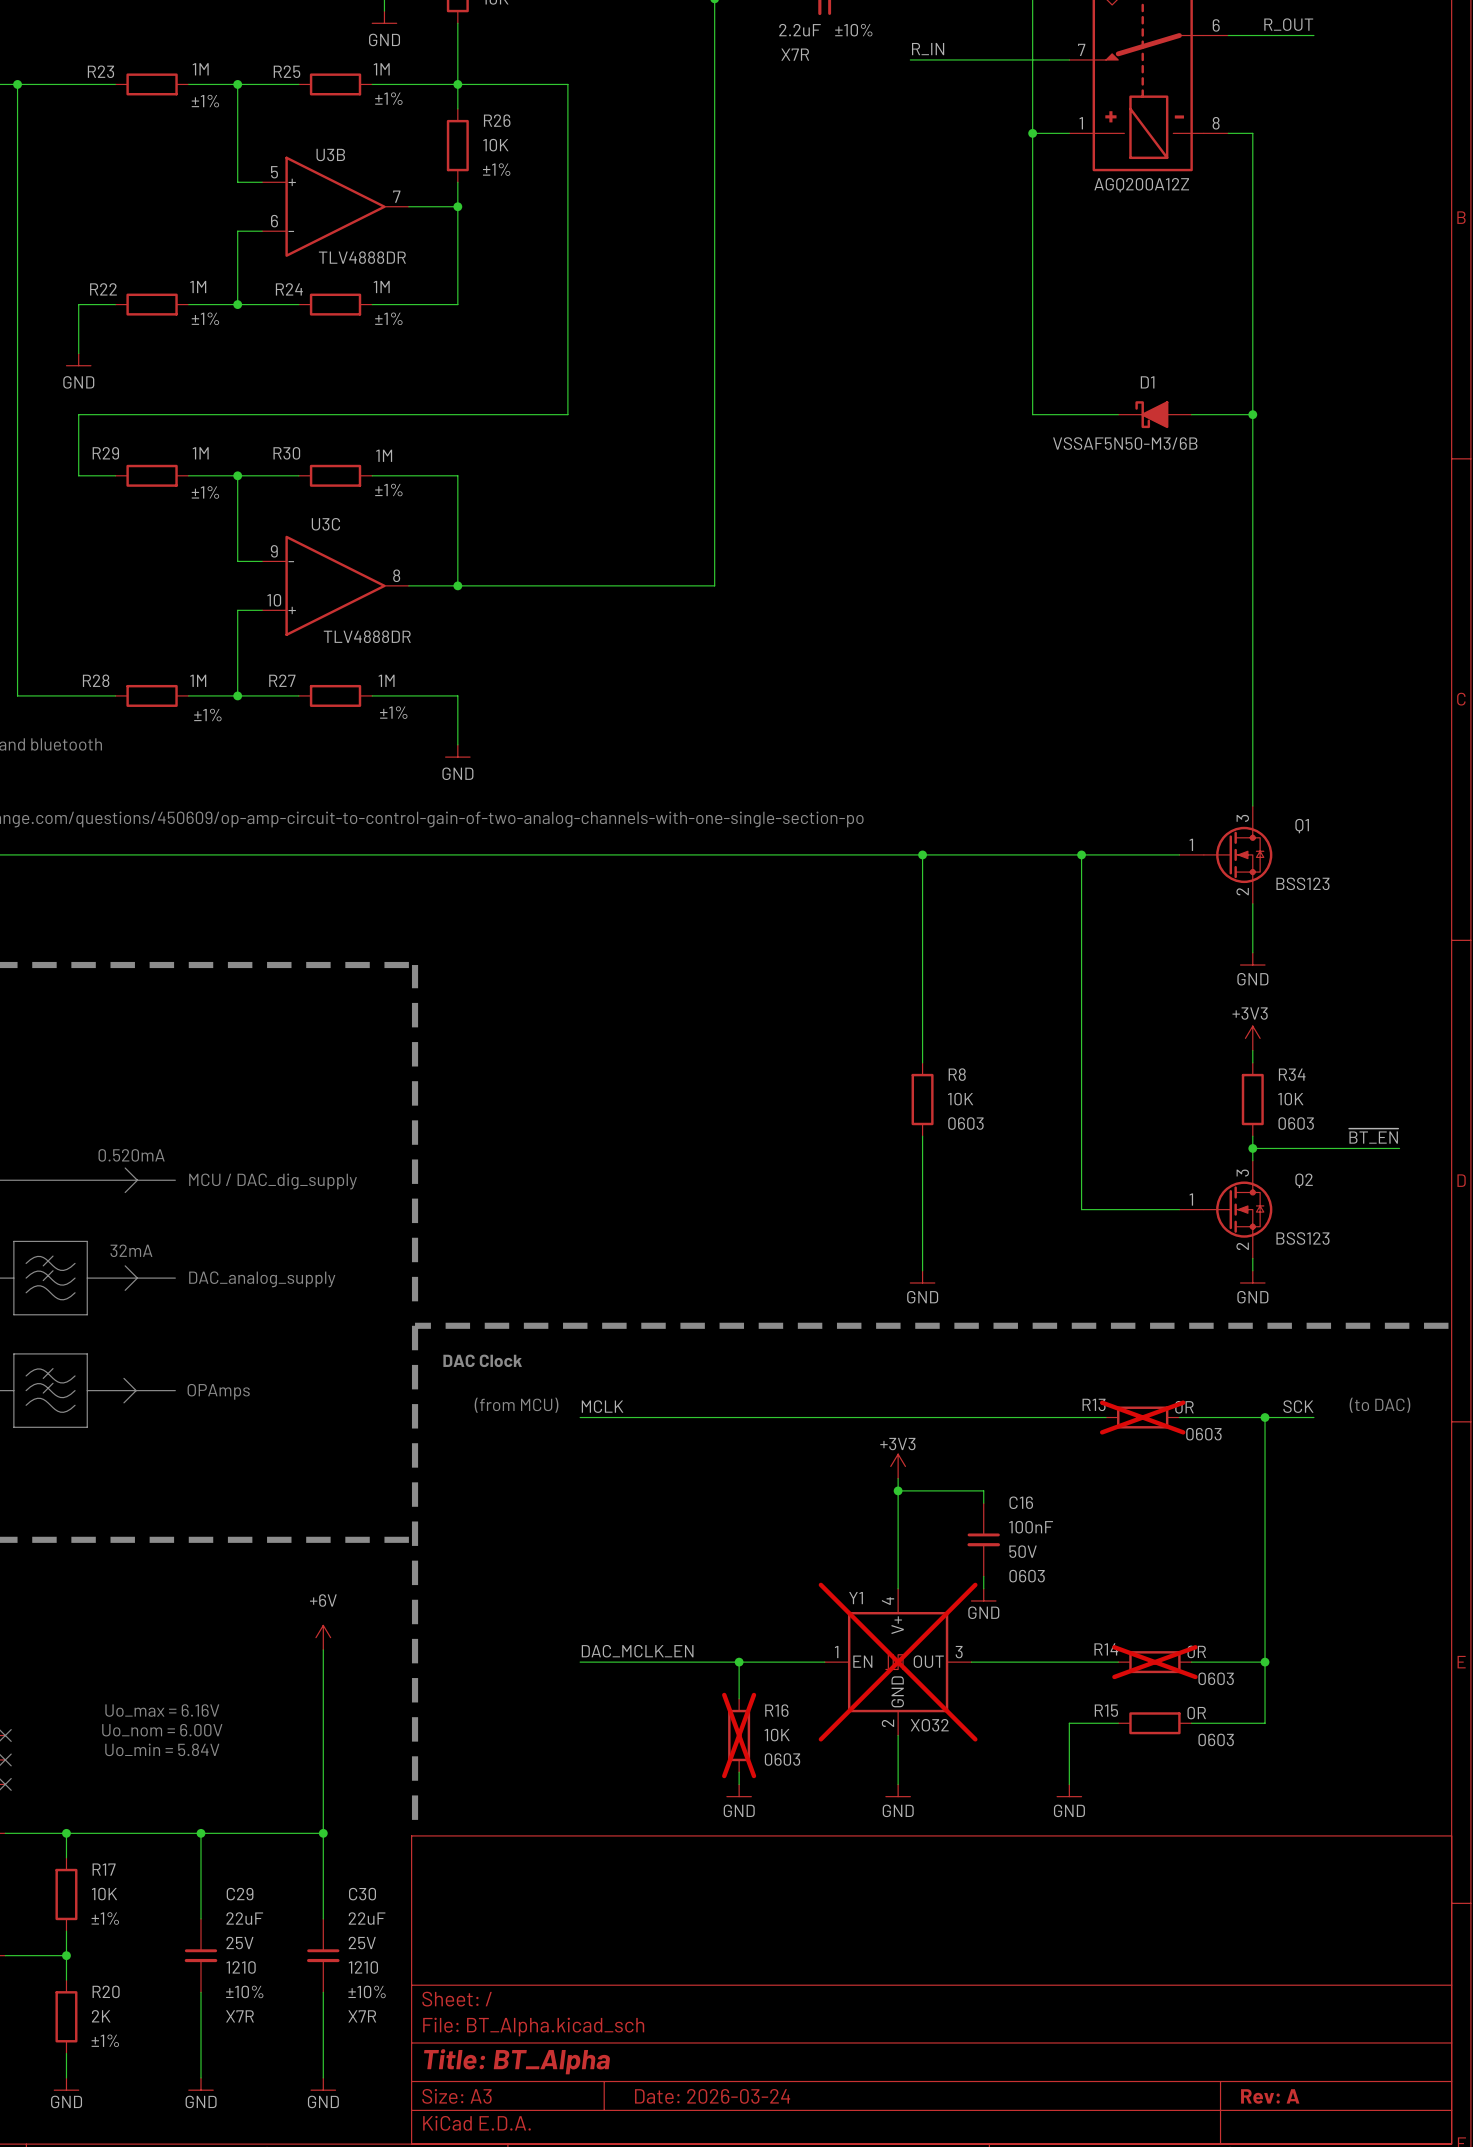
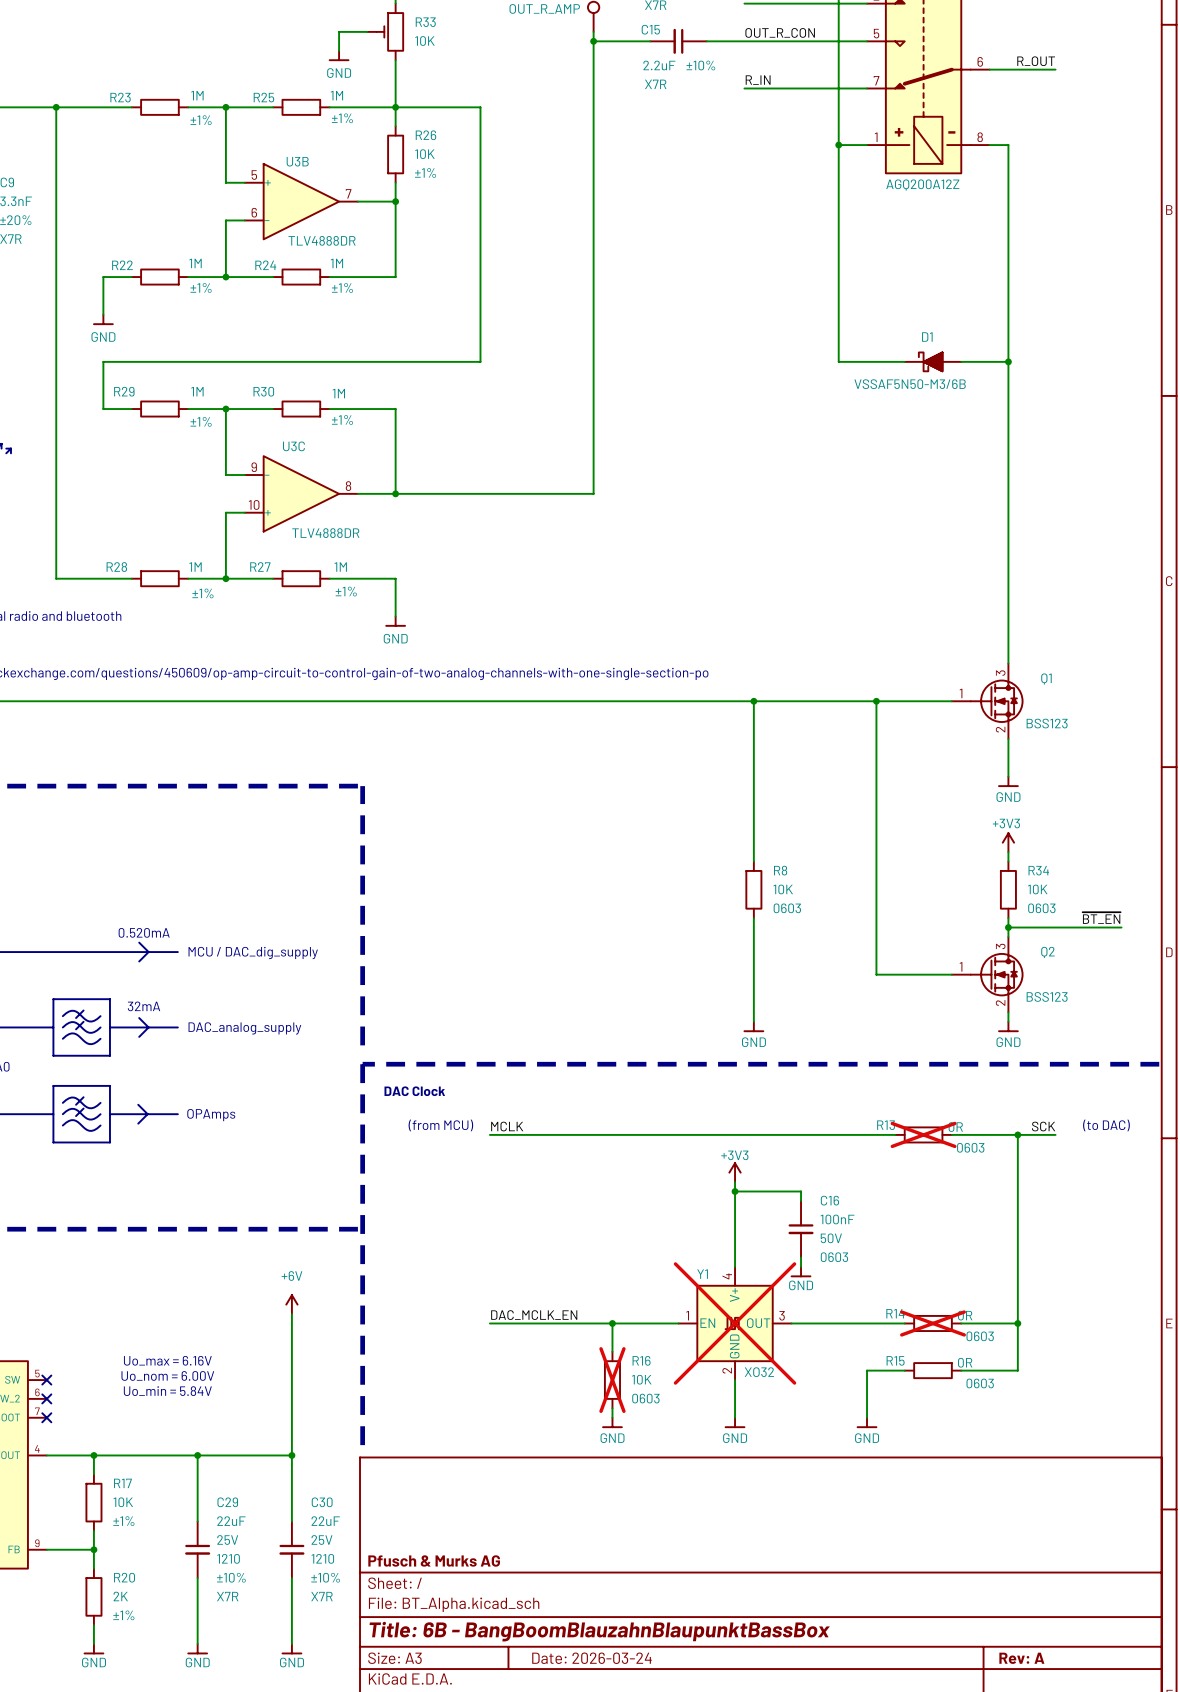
title block: none -> Pfusch & Murks AG (434, 1560)
title block: Title: BT_Alpha (517, 2061) -> Title: 6B - BangBoomBlauzahnBlaupunktBassBox (599, 1631)

